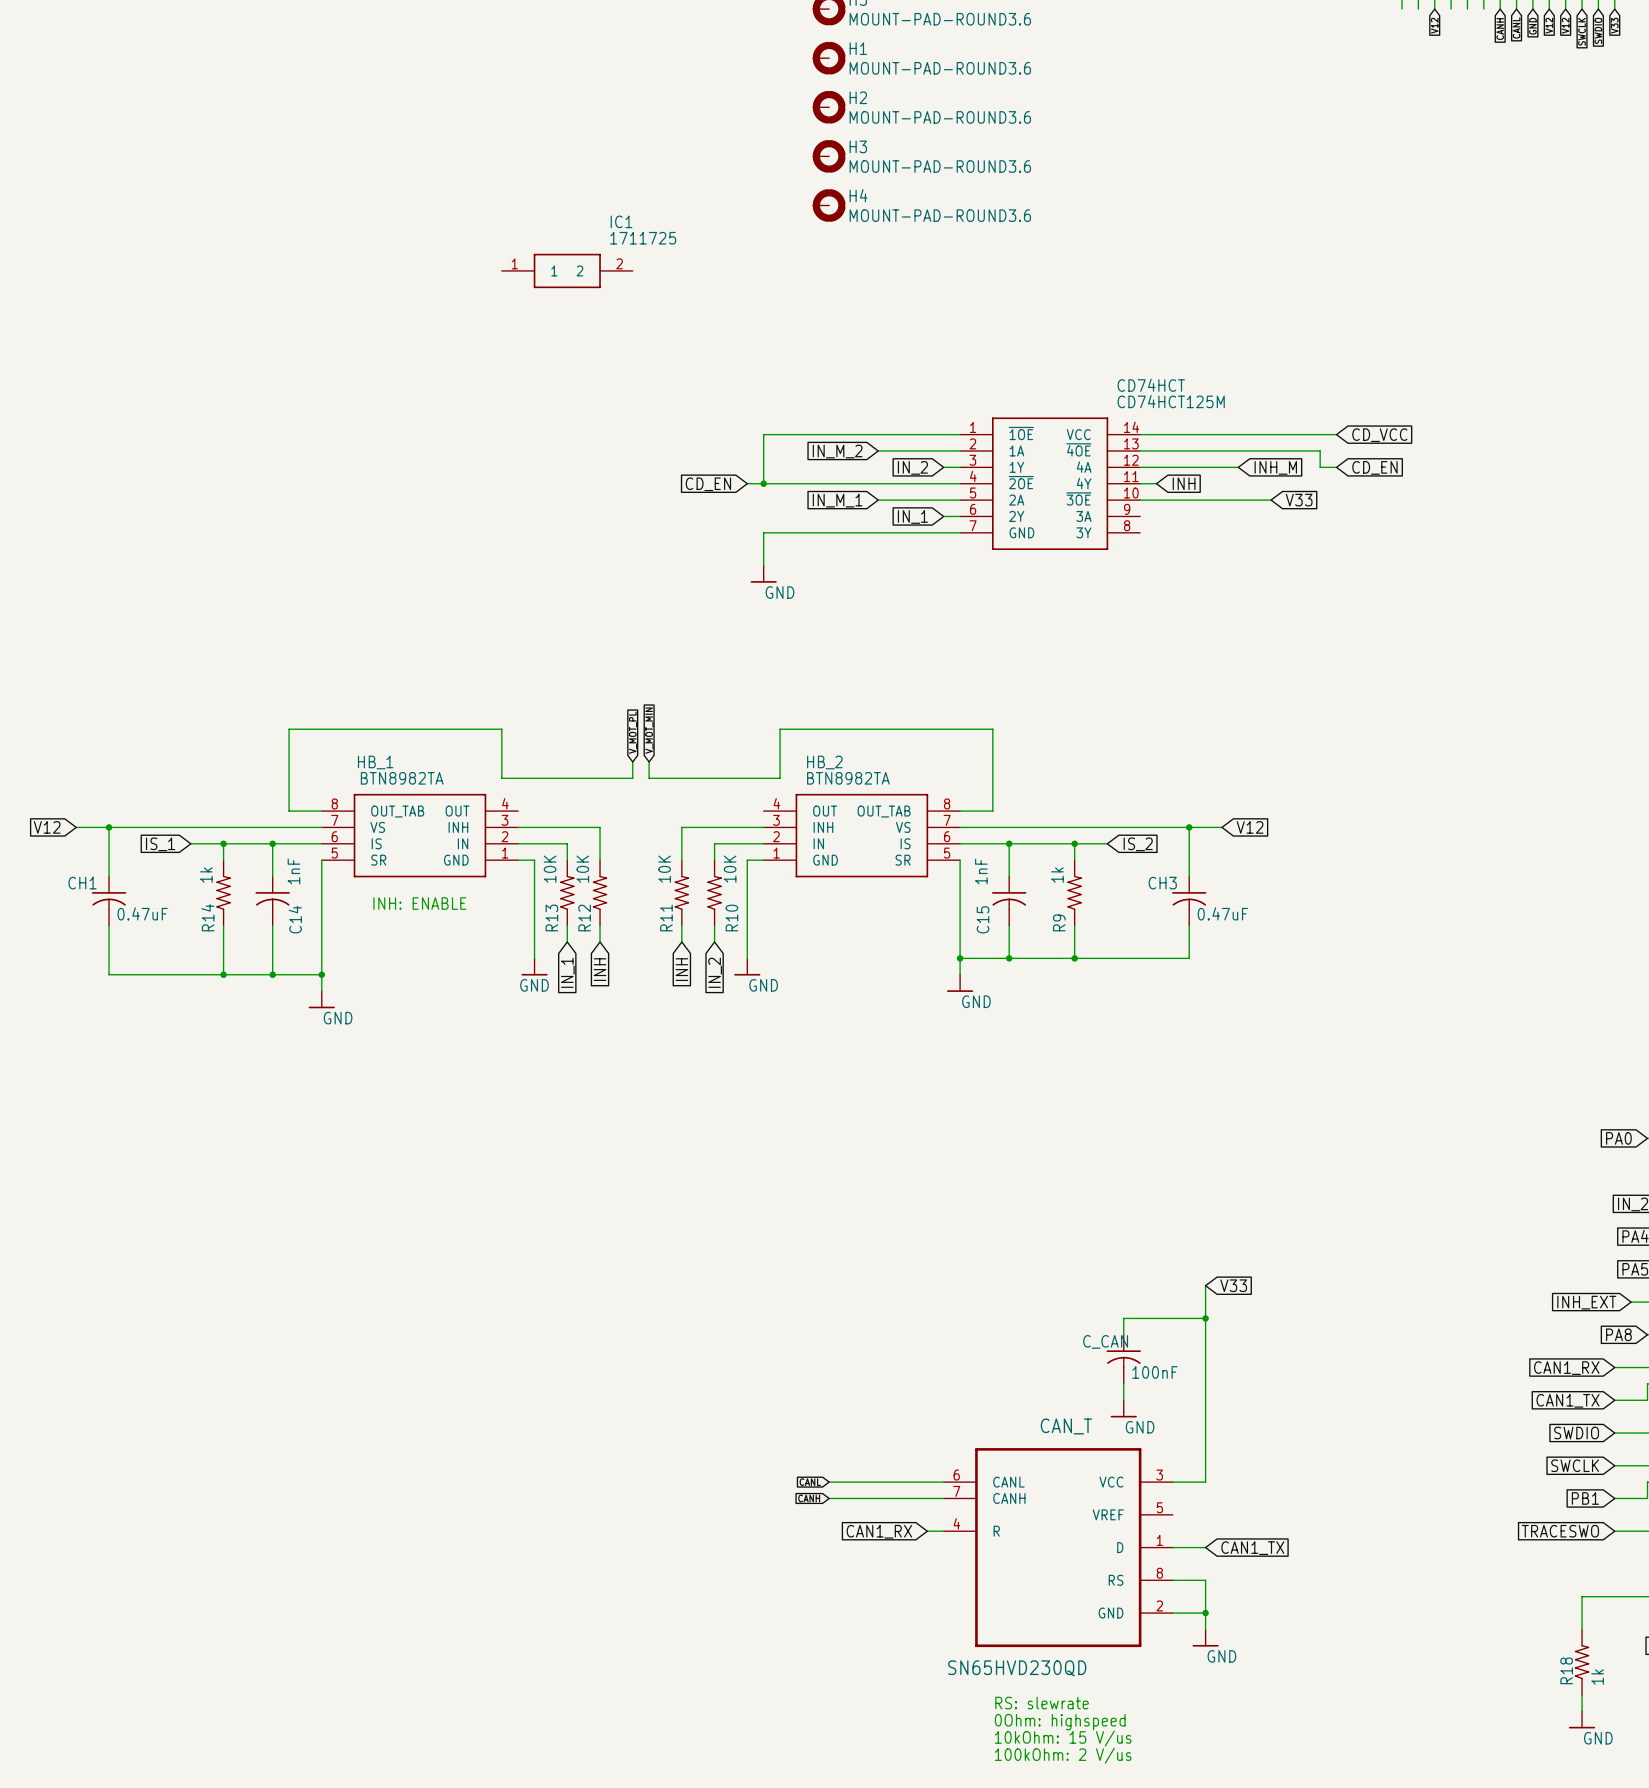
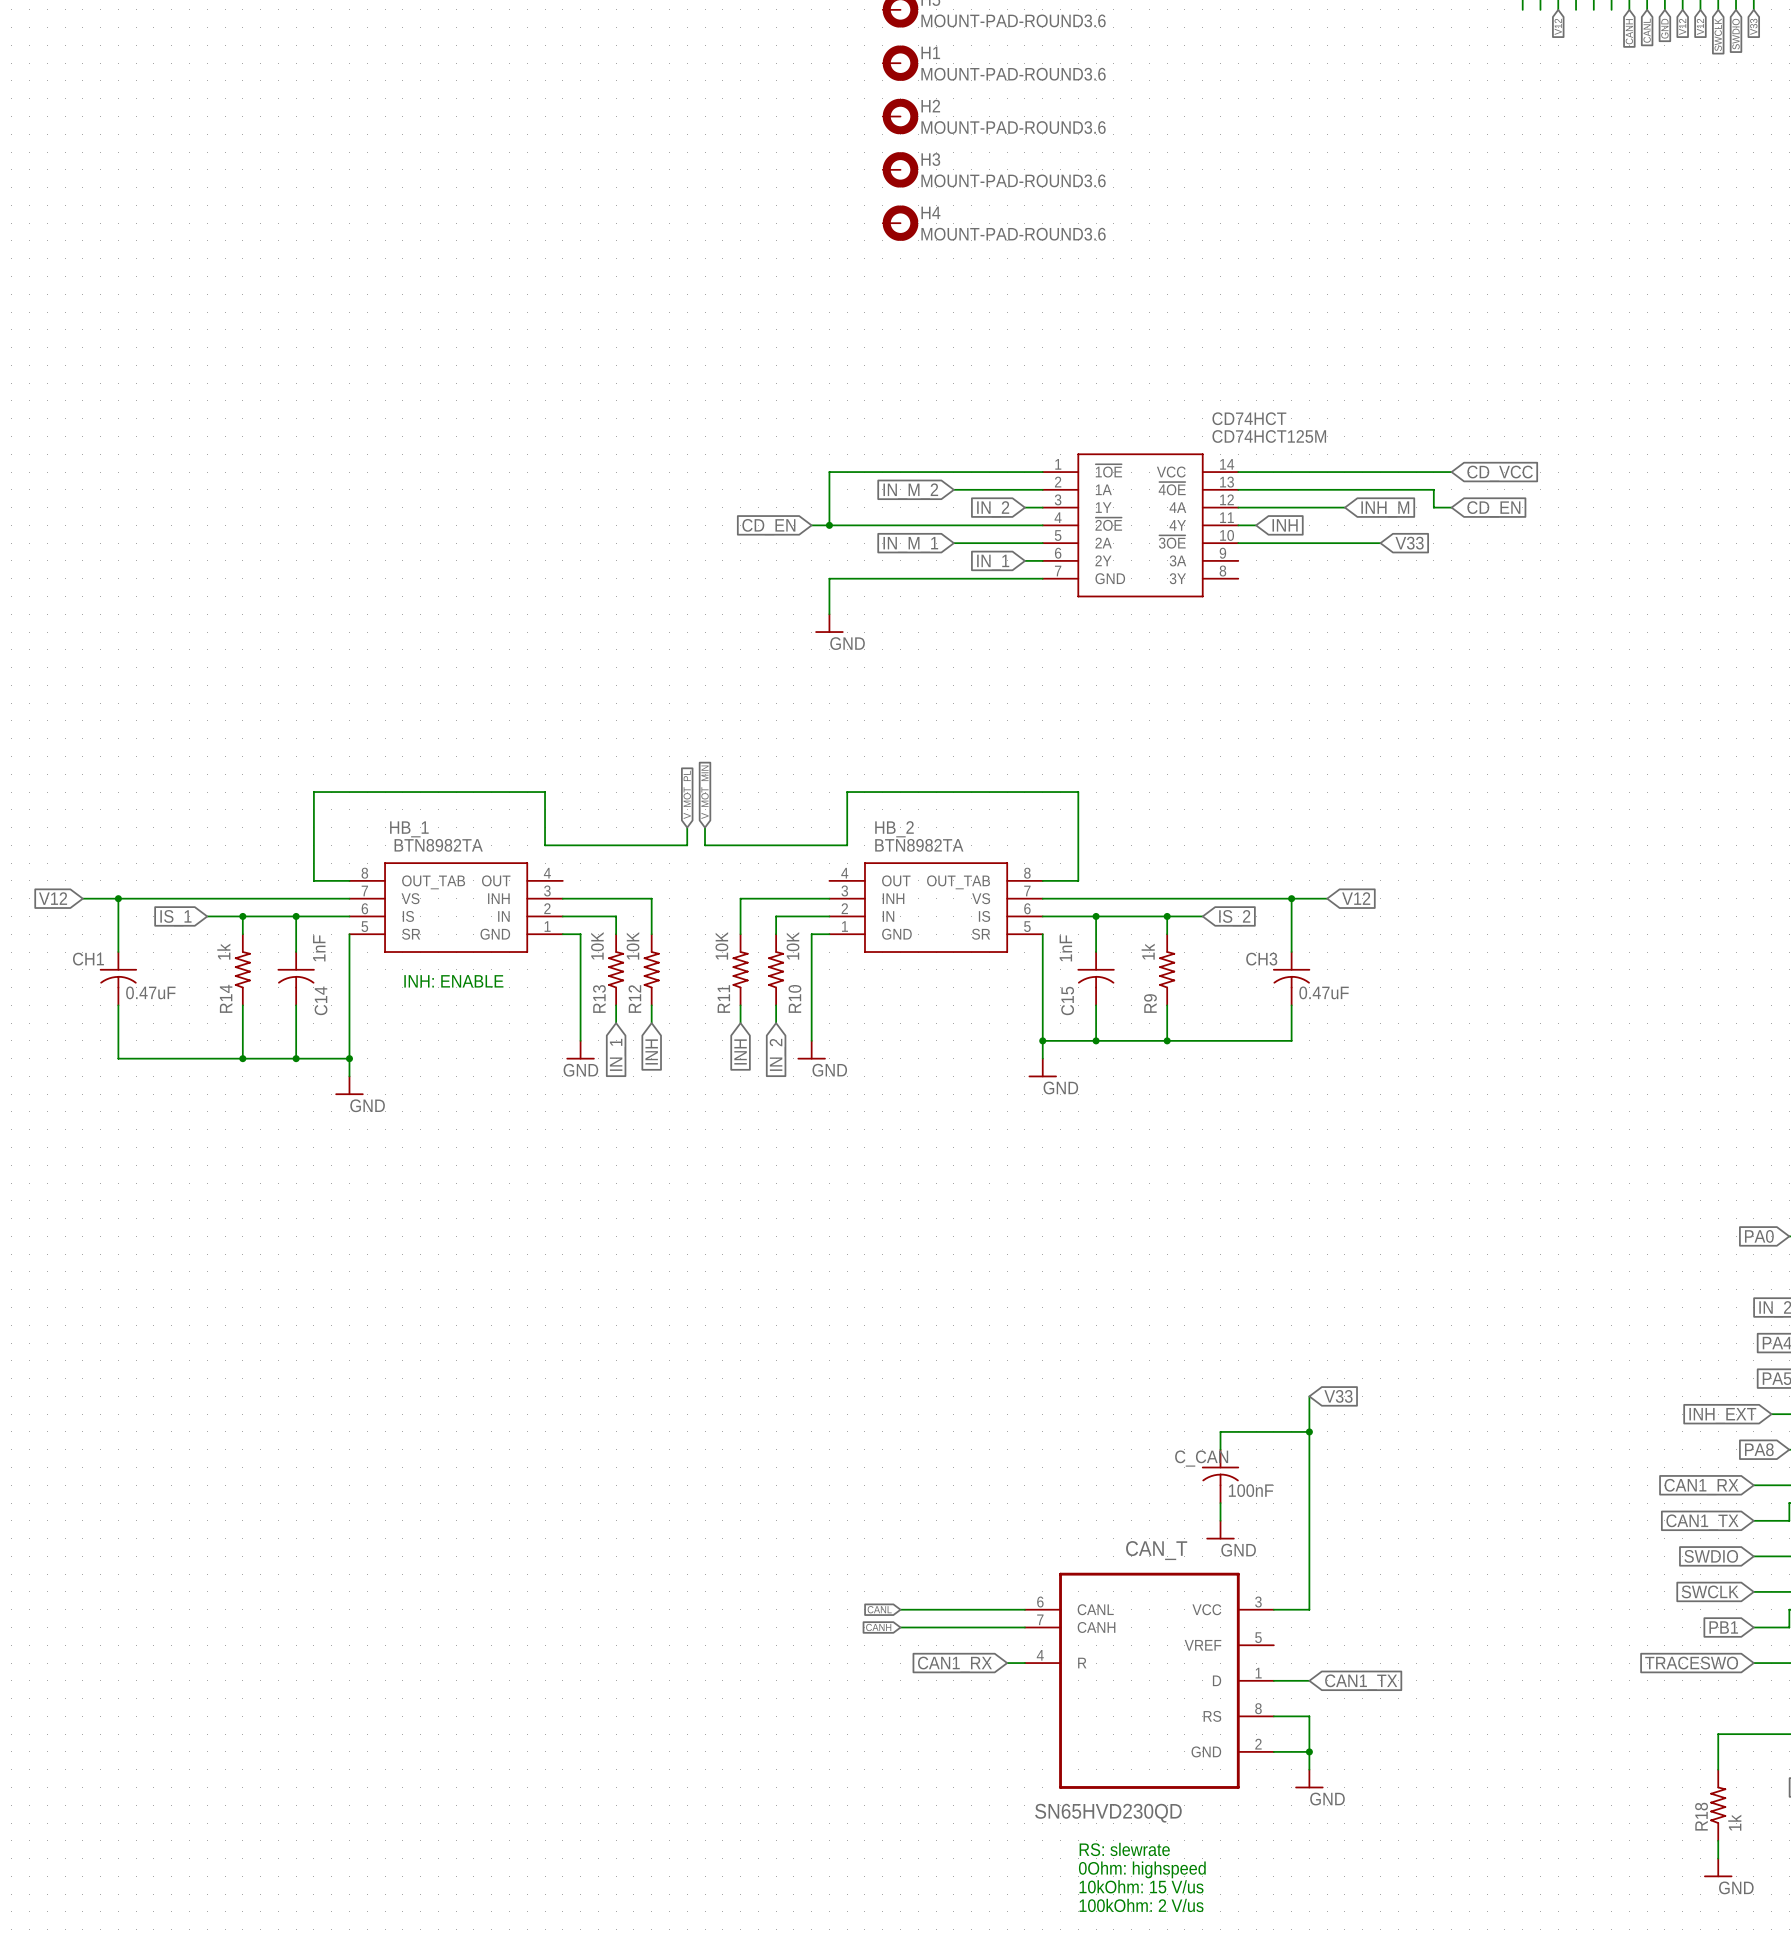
IC1: 1711725 (567, 270) -> none

